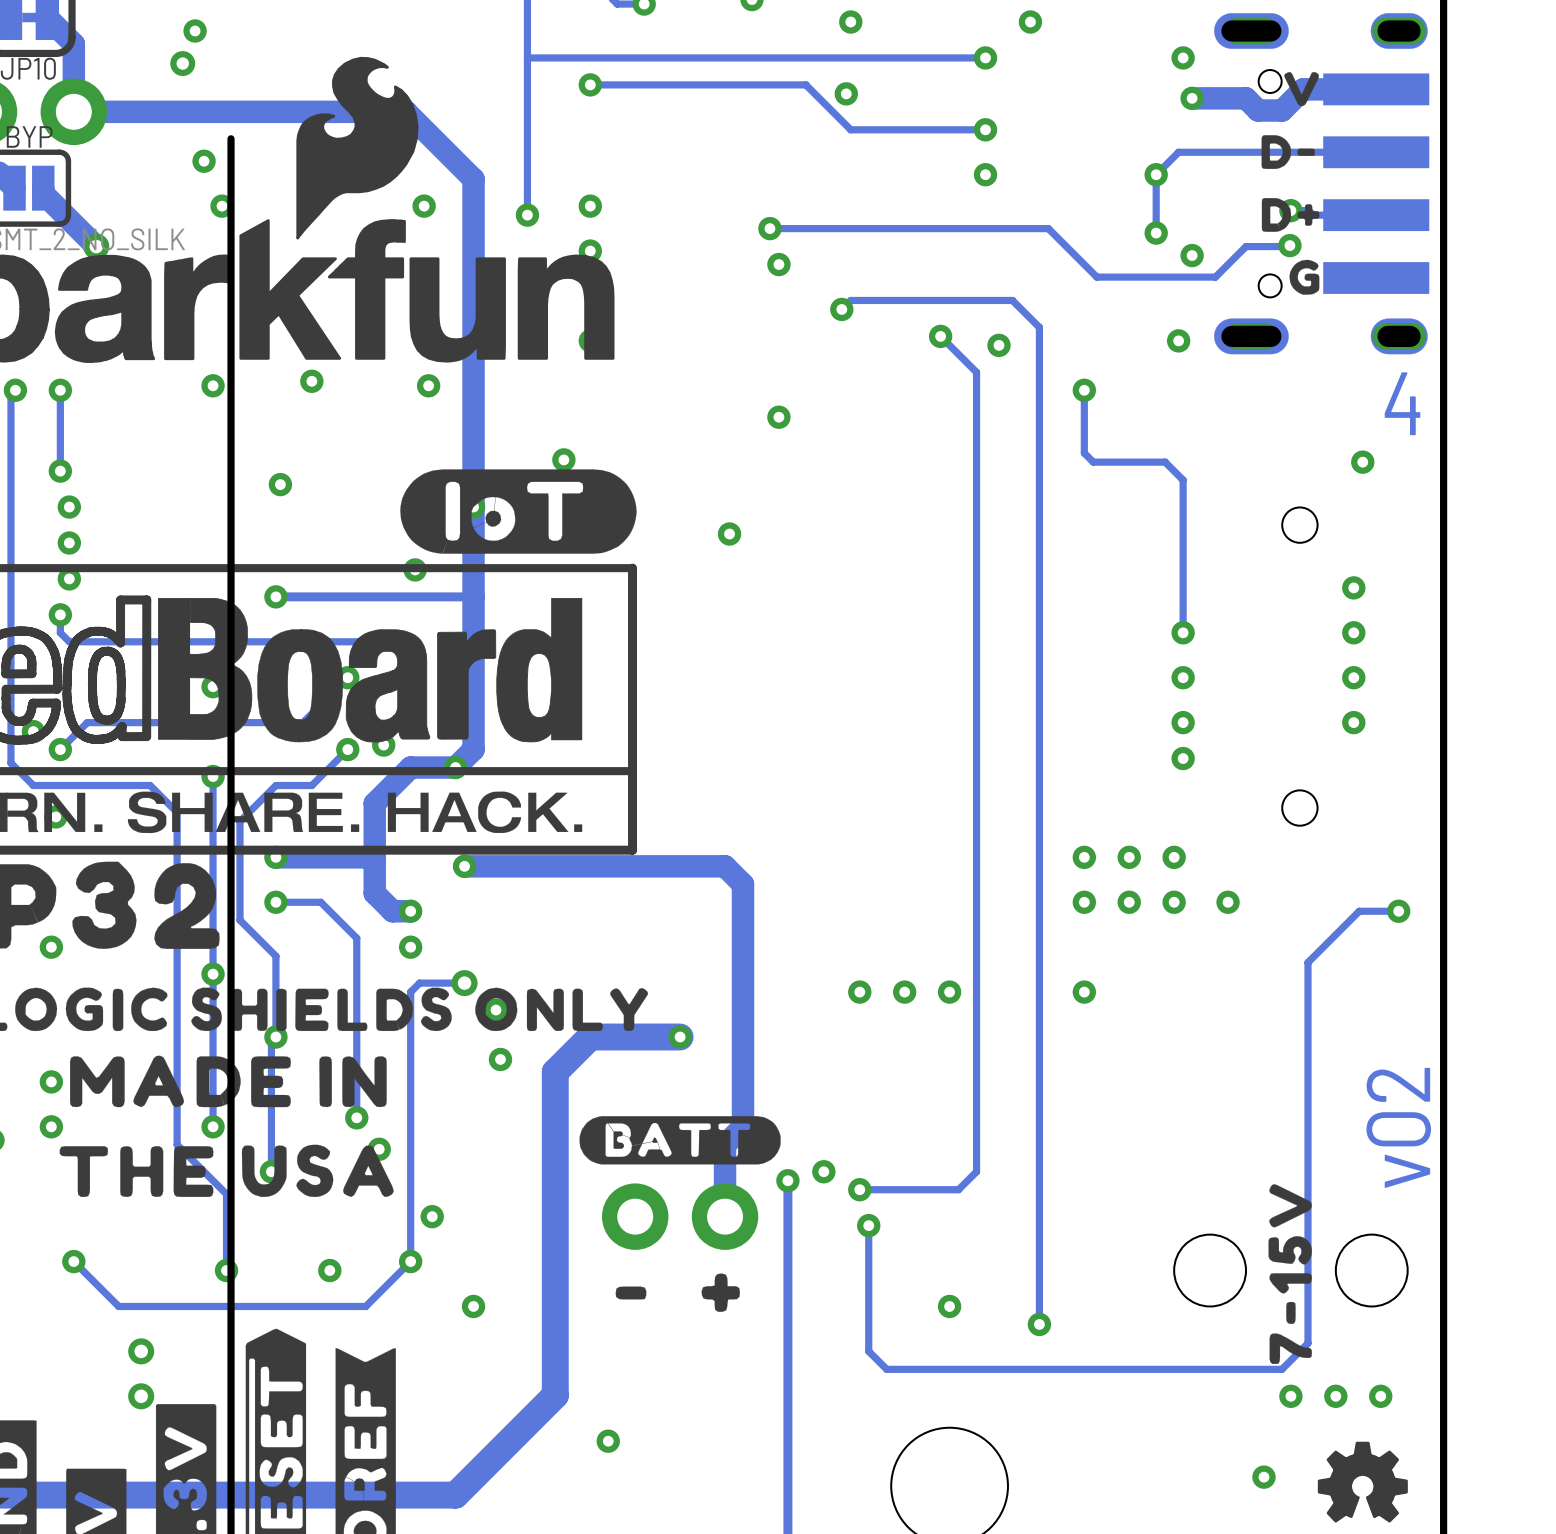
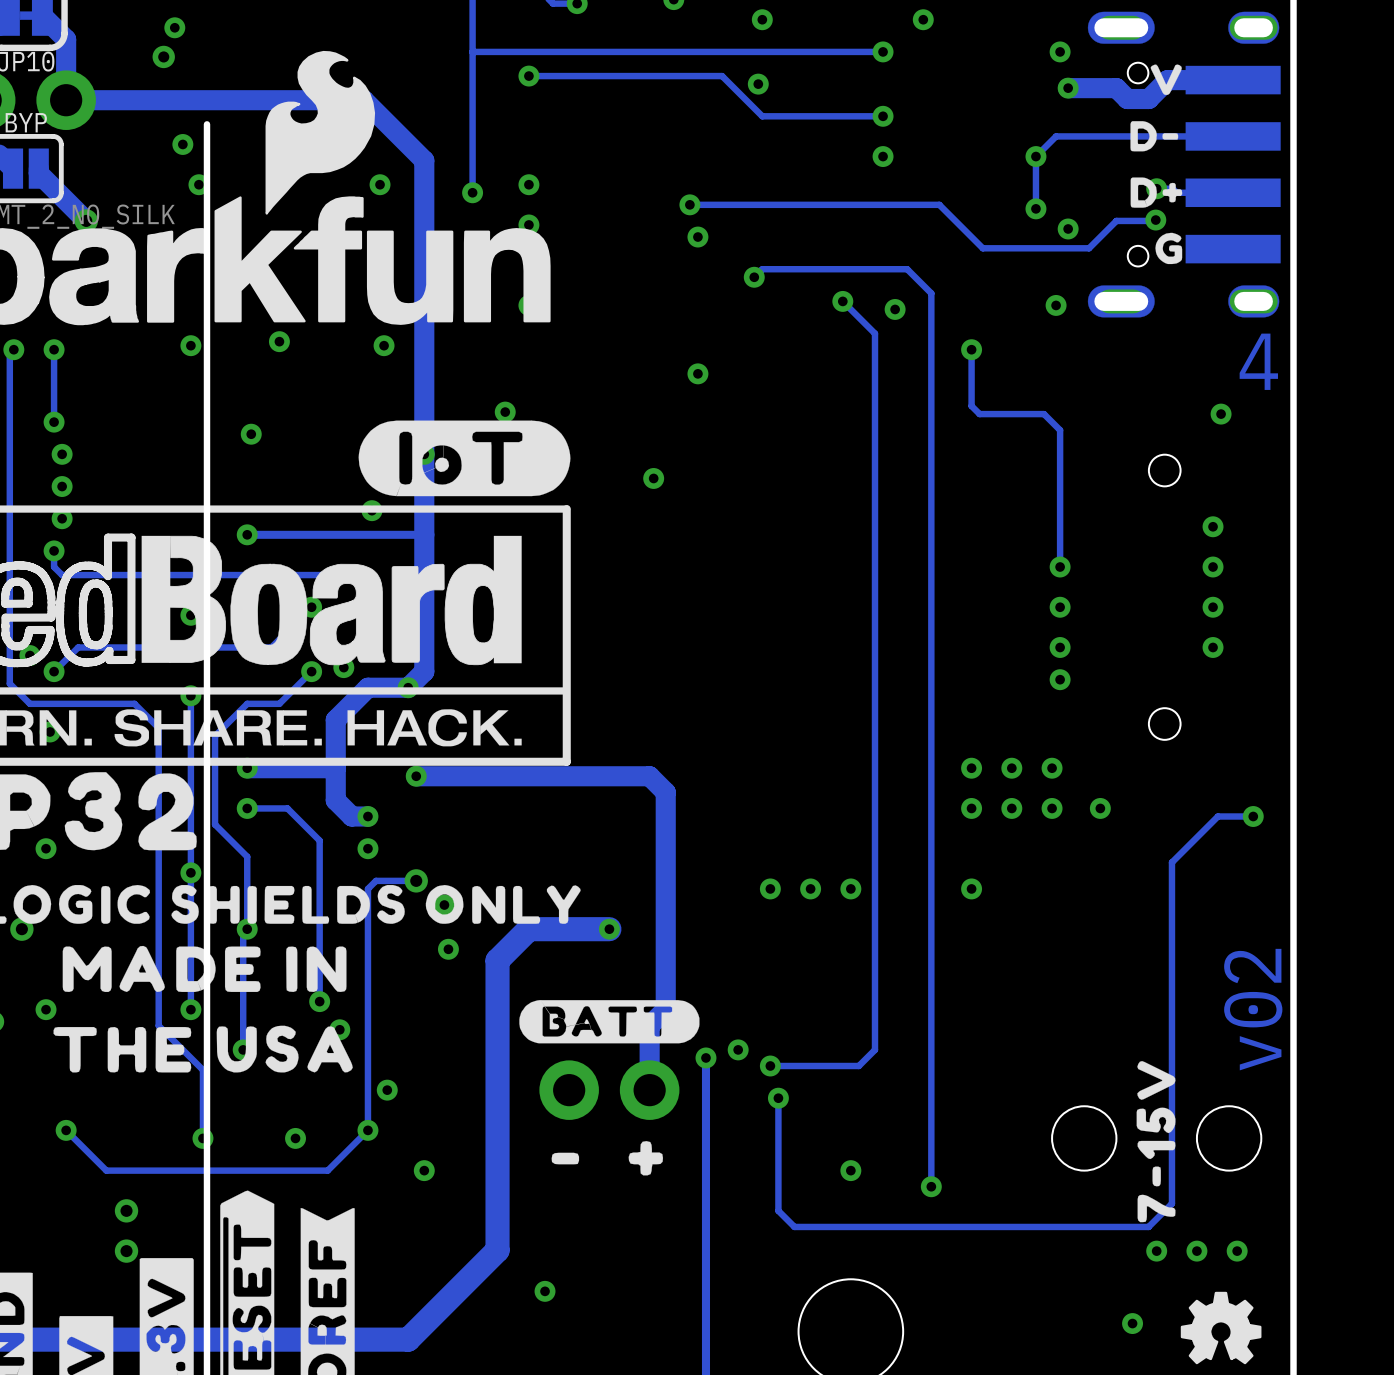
via: none -> (21, 929)
via: (51, 1081) -> none

